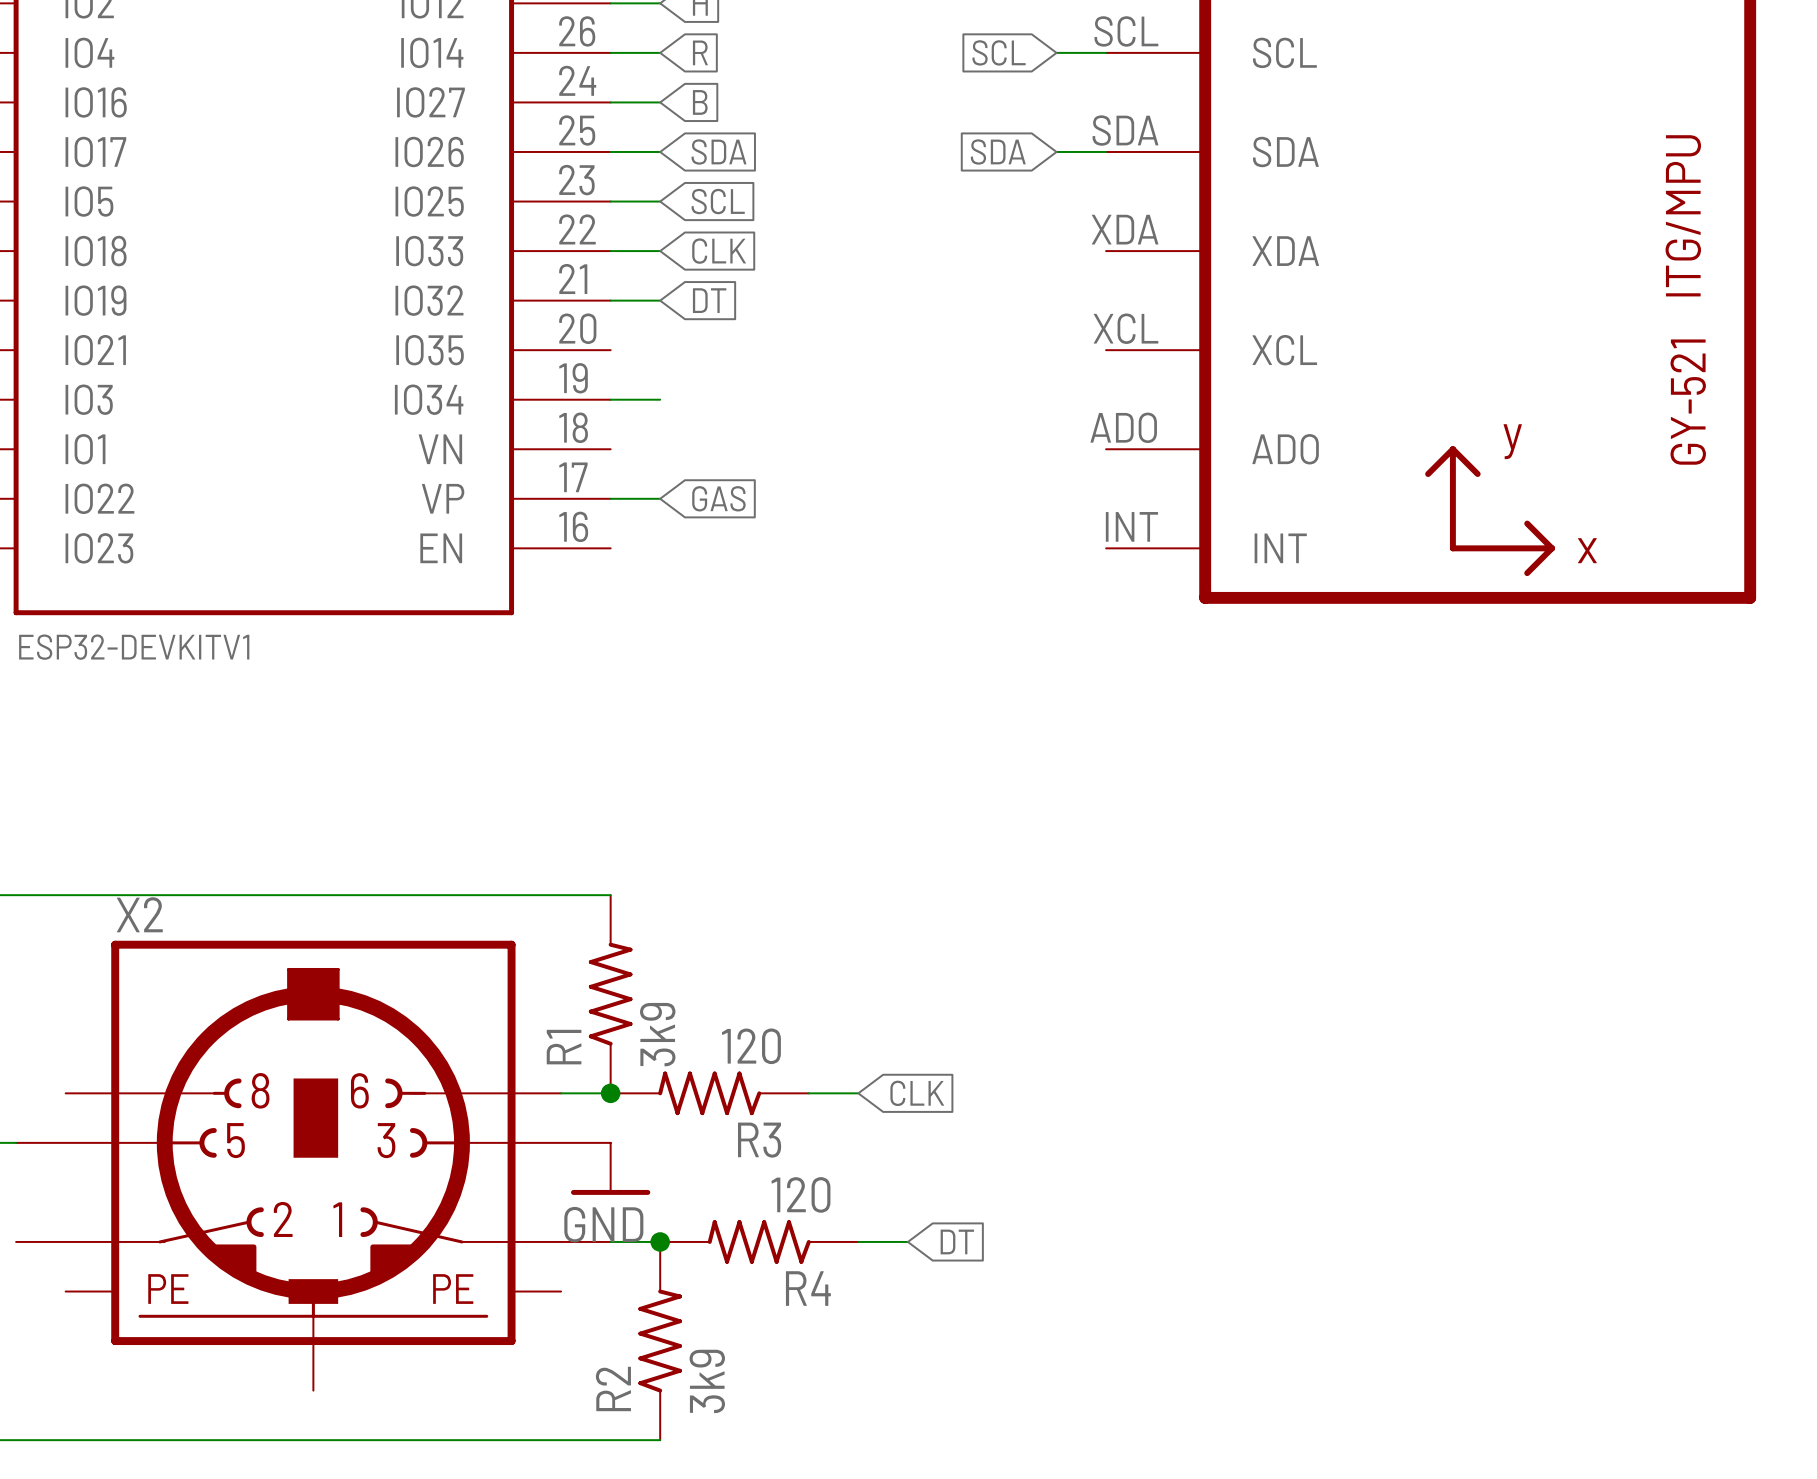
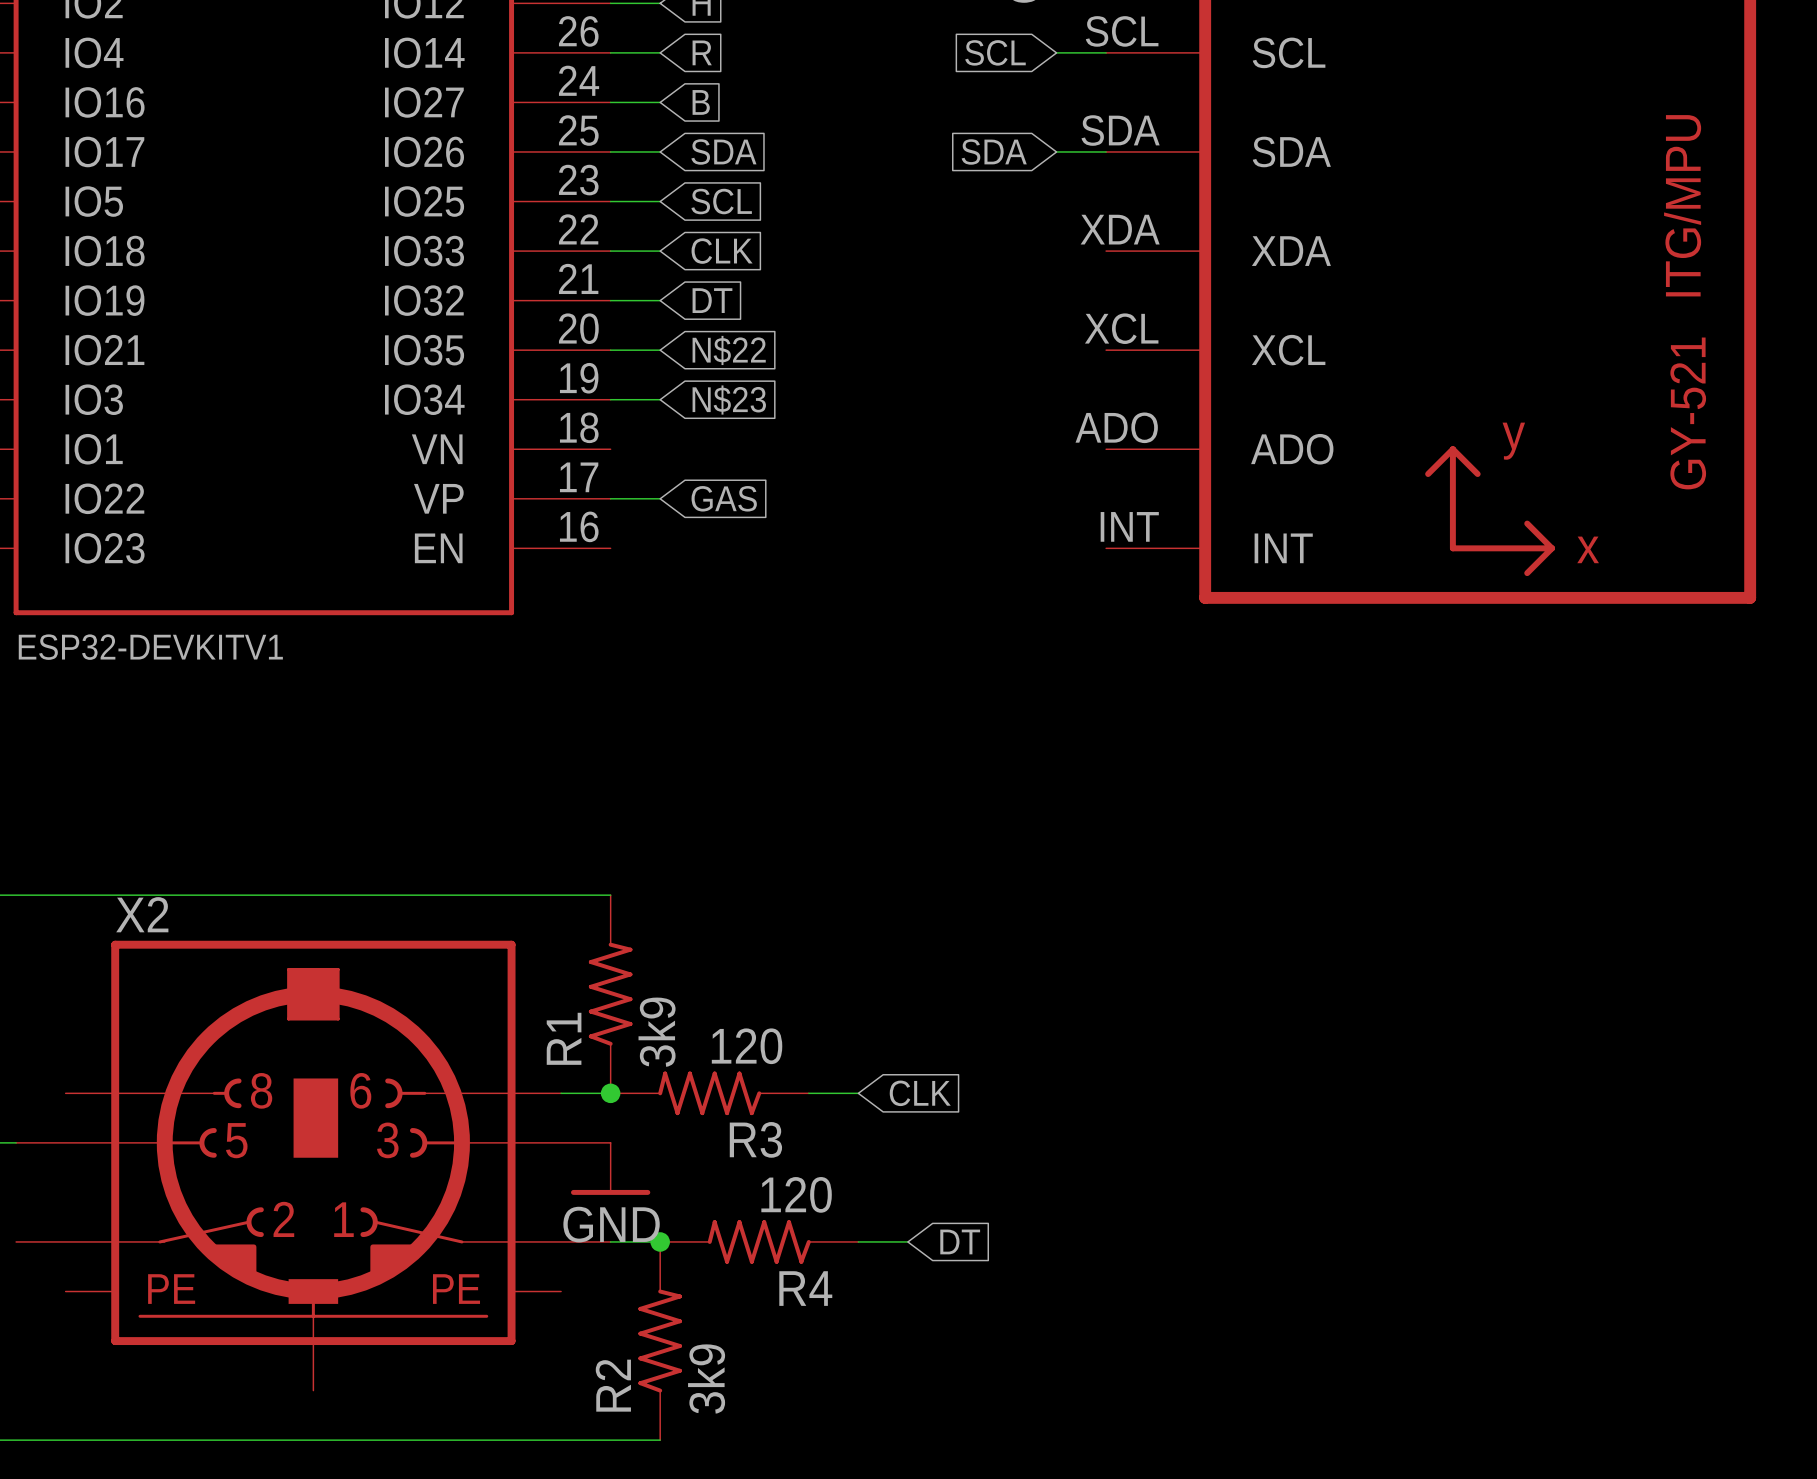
wire: none -> (610, 350) (660, 350)
global label: none -> N$22 (729, 350)
global label: none -> N$23 (729, 400)

